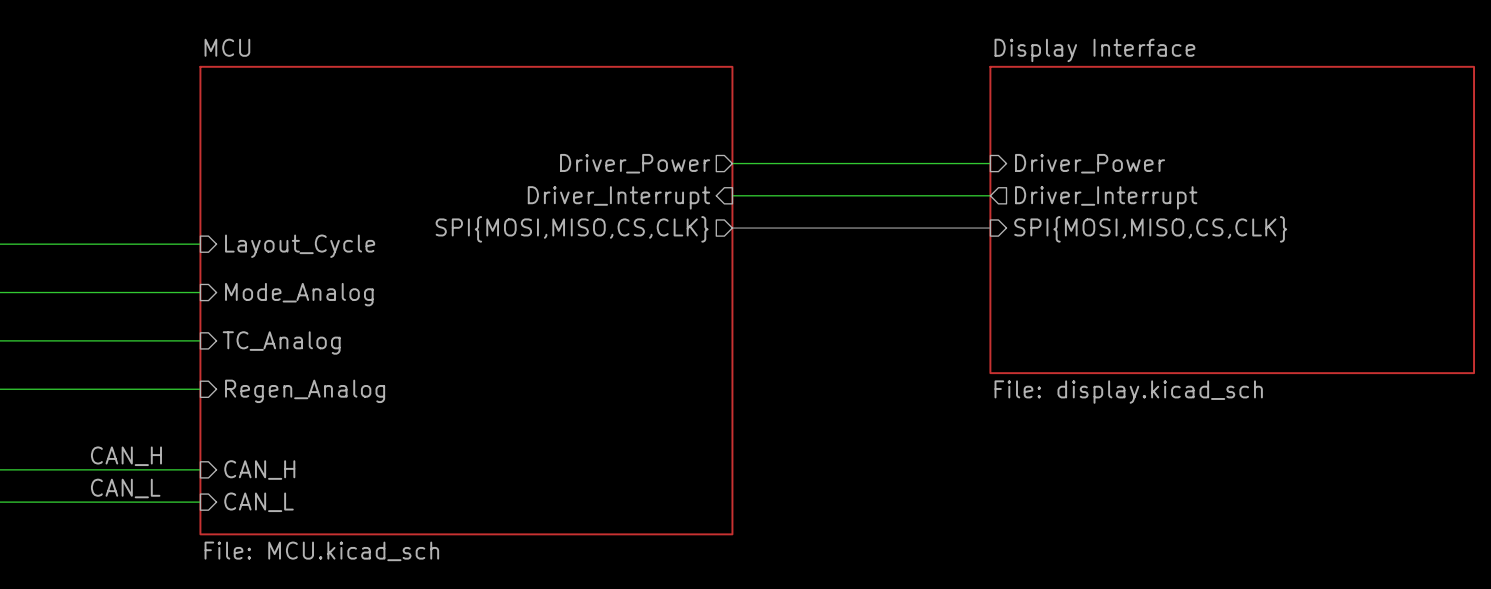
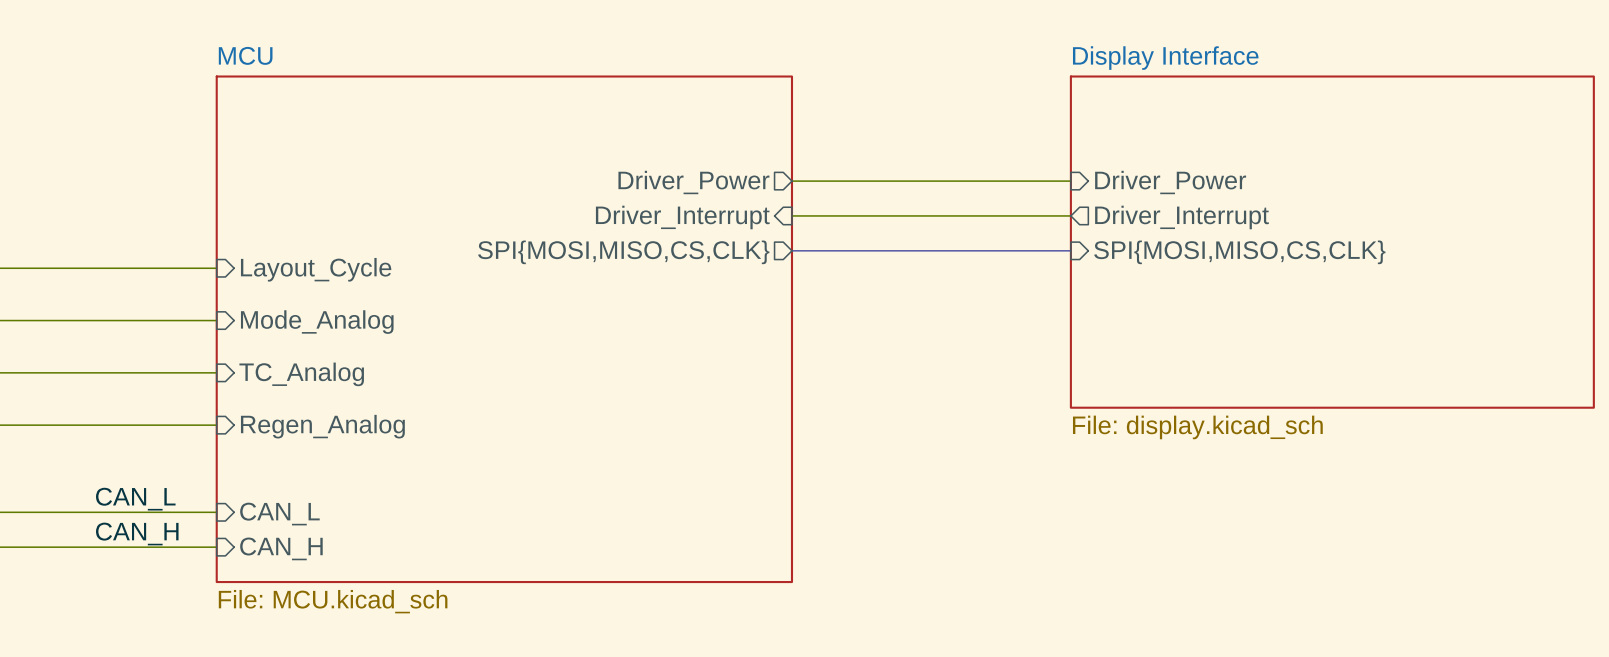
label: CAN_H (126, 456) -> CAN_L (135, 499)
sheet pin: CAN_H (259, 470) -> CAN_L (279, 514)
label: CAN_L (125, 488) -> CAN_H (137, 534)
sheet pin: CAN_L (259, 502) -> CAN_H (281, 548)

